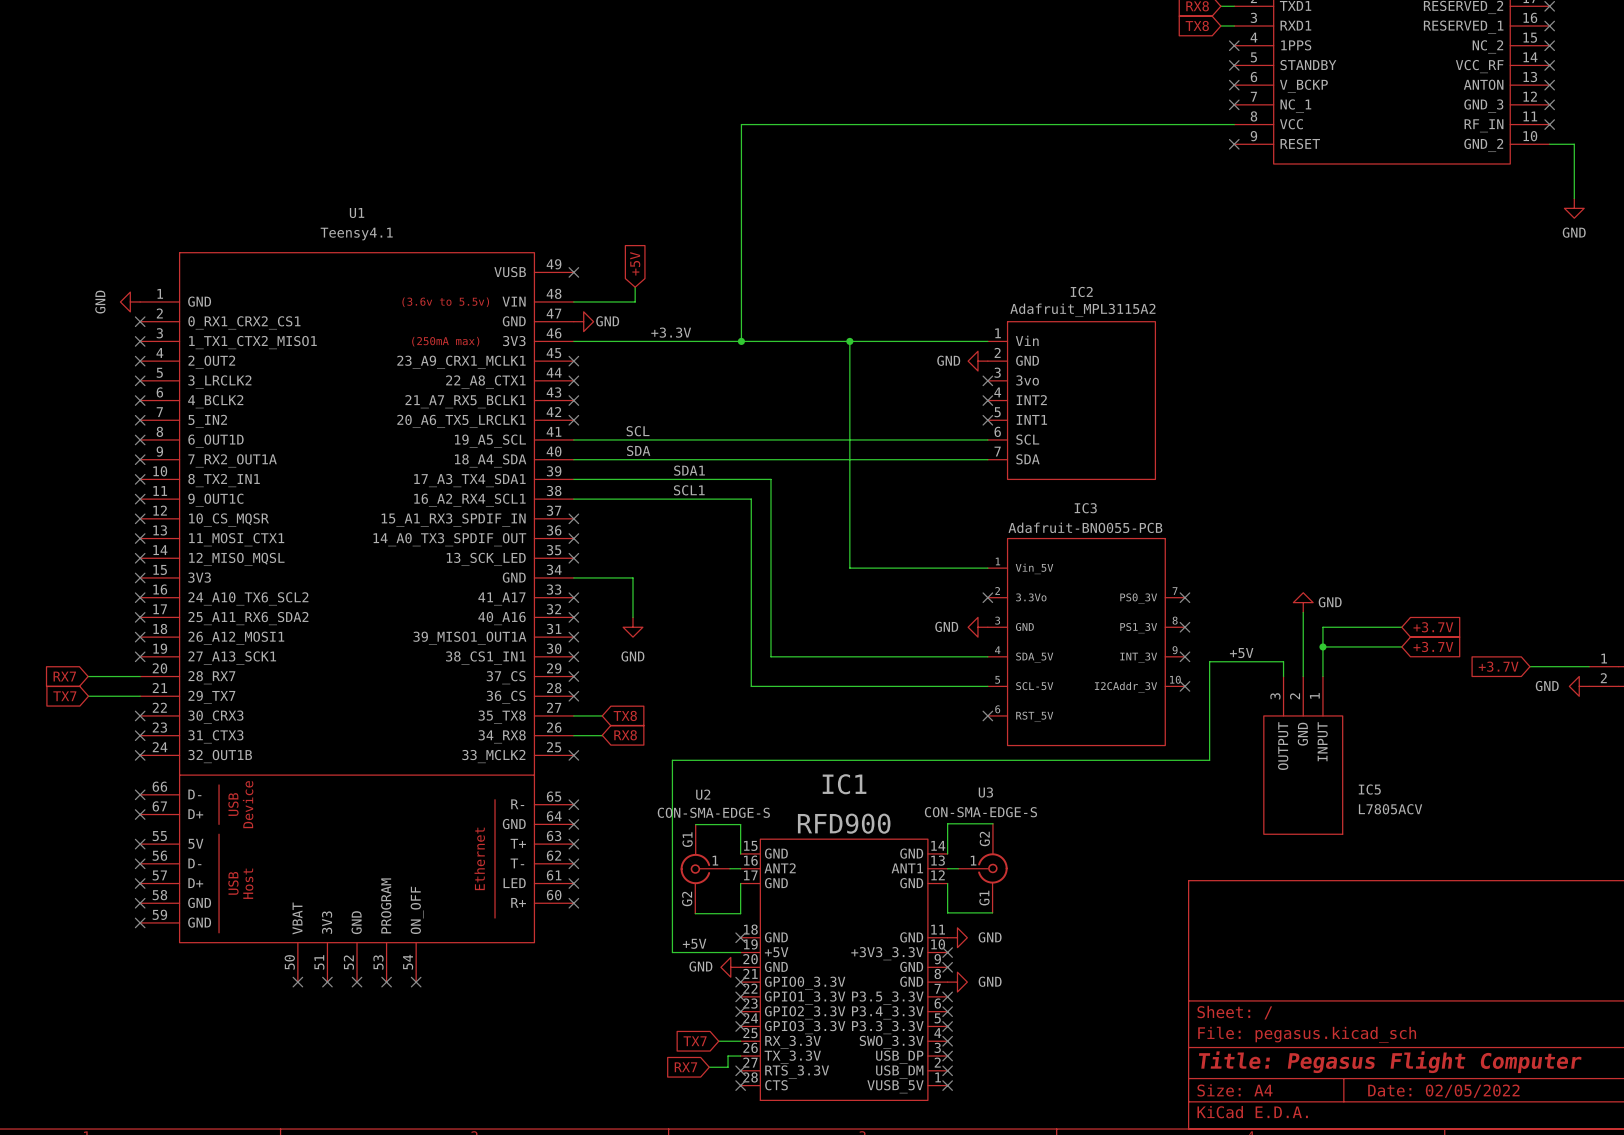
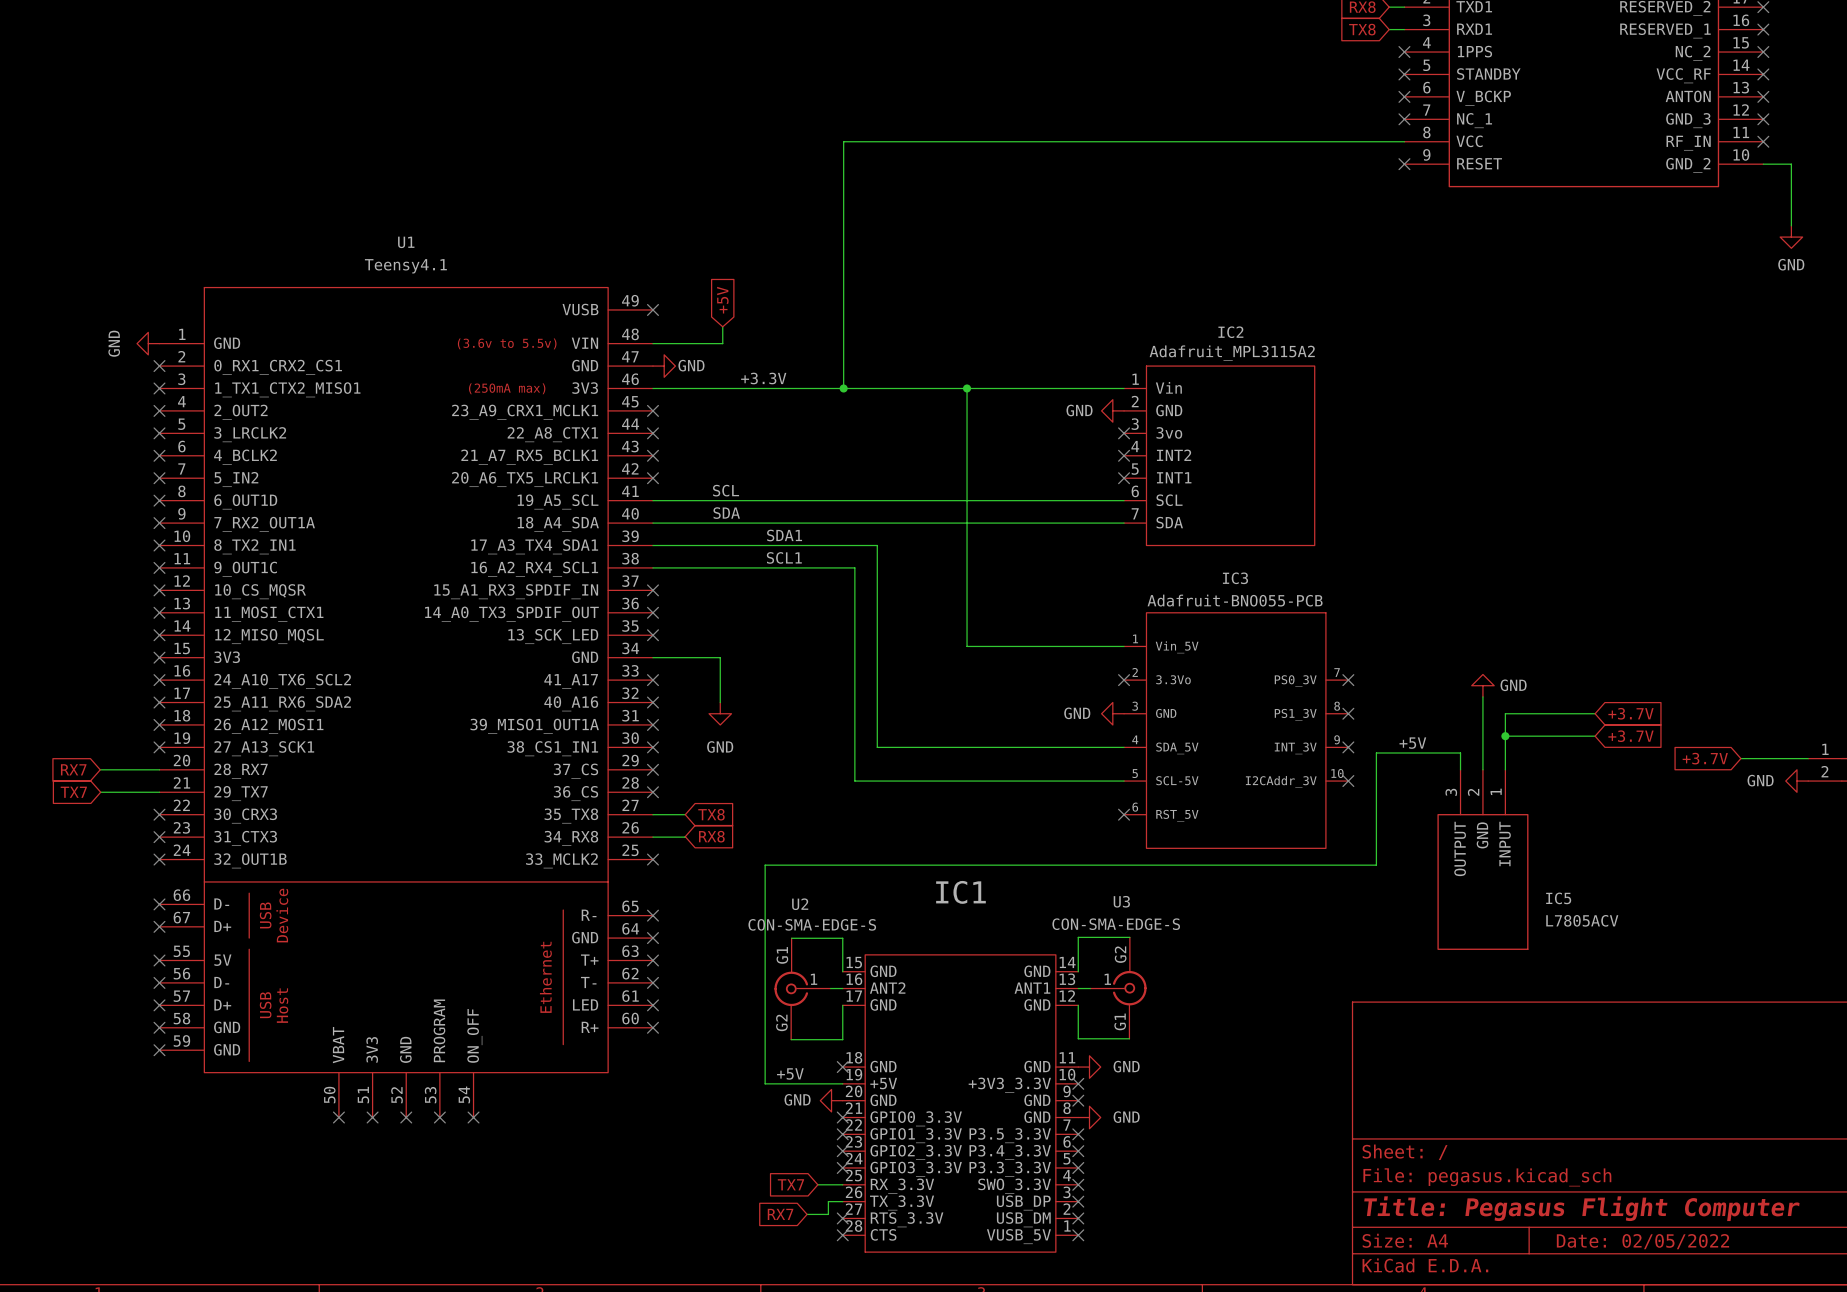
IC1 value: RFD900 (844, 823) -> none

